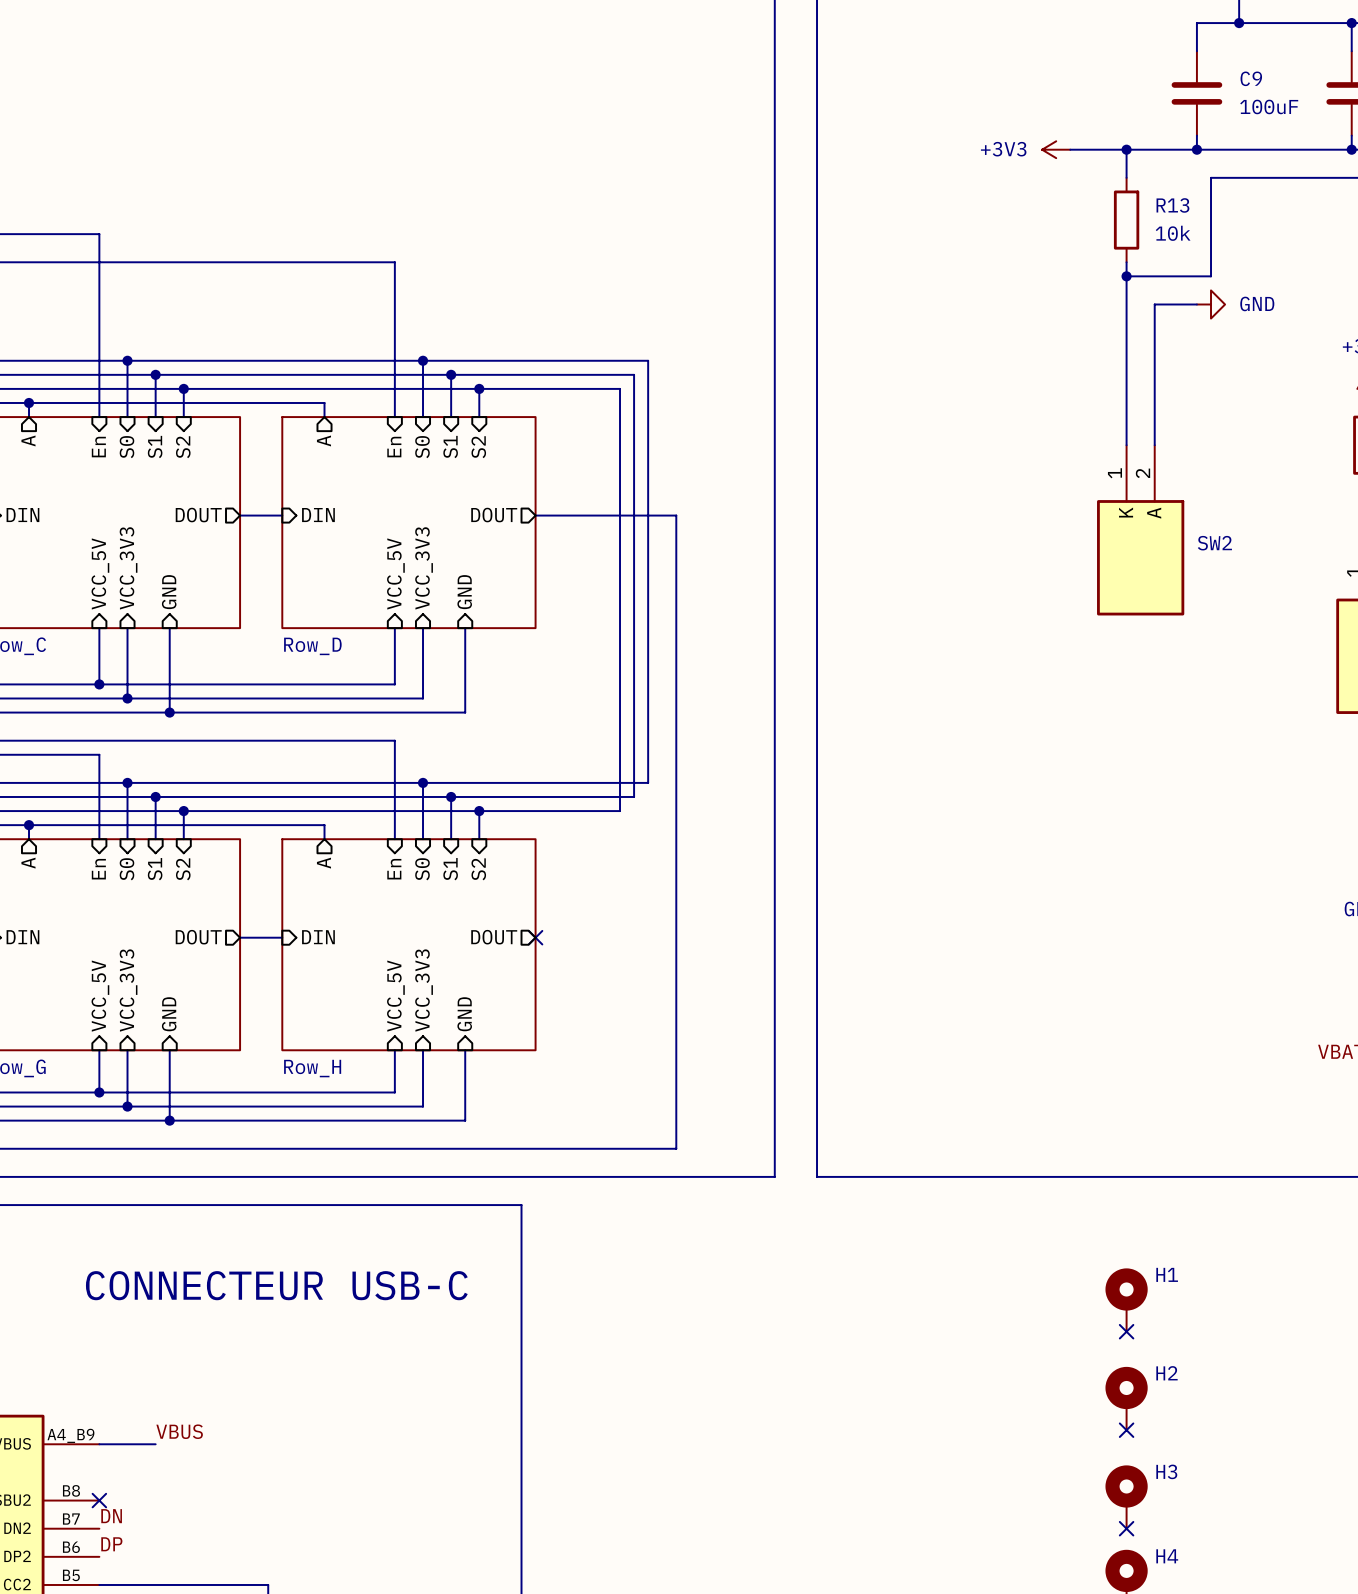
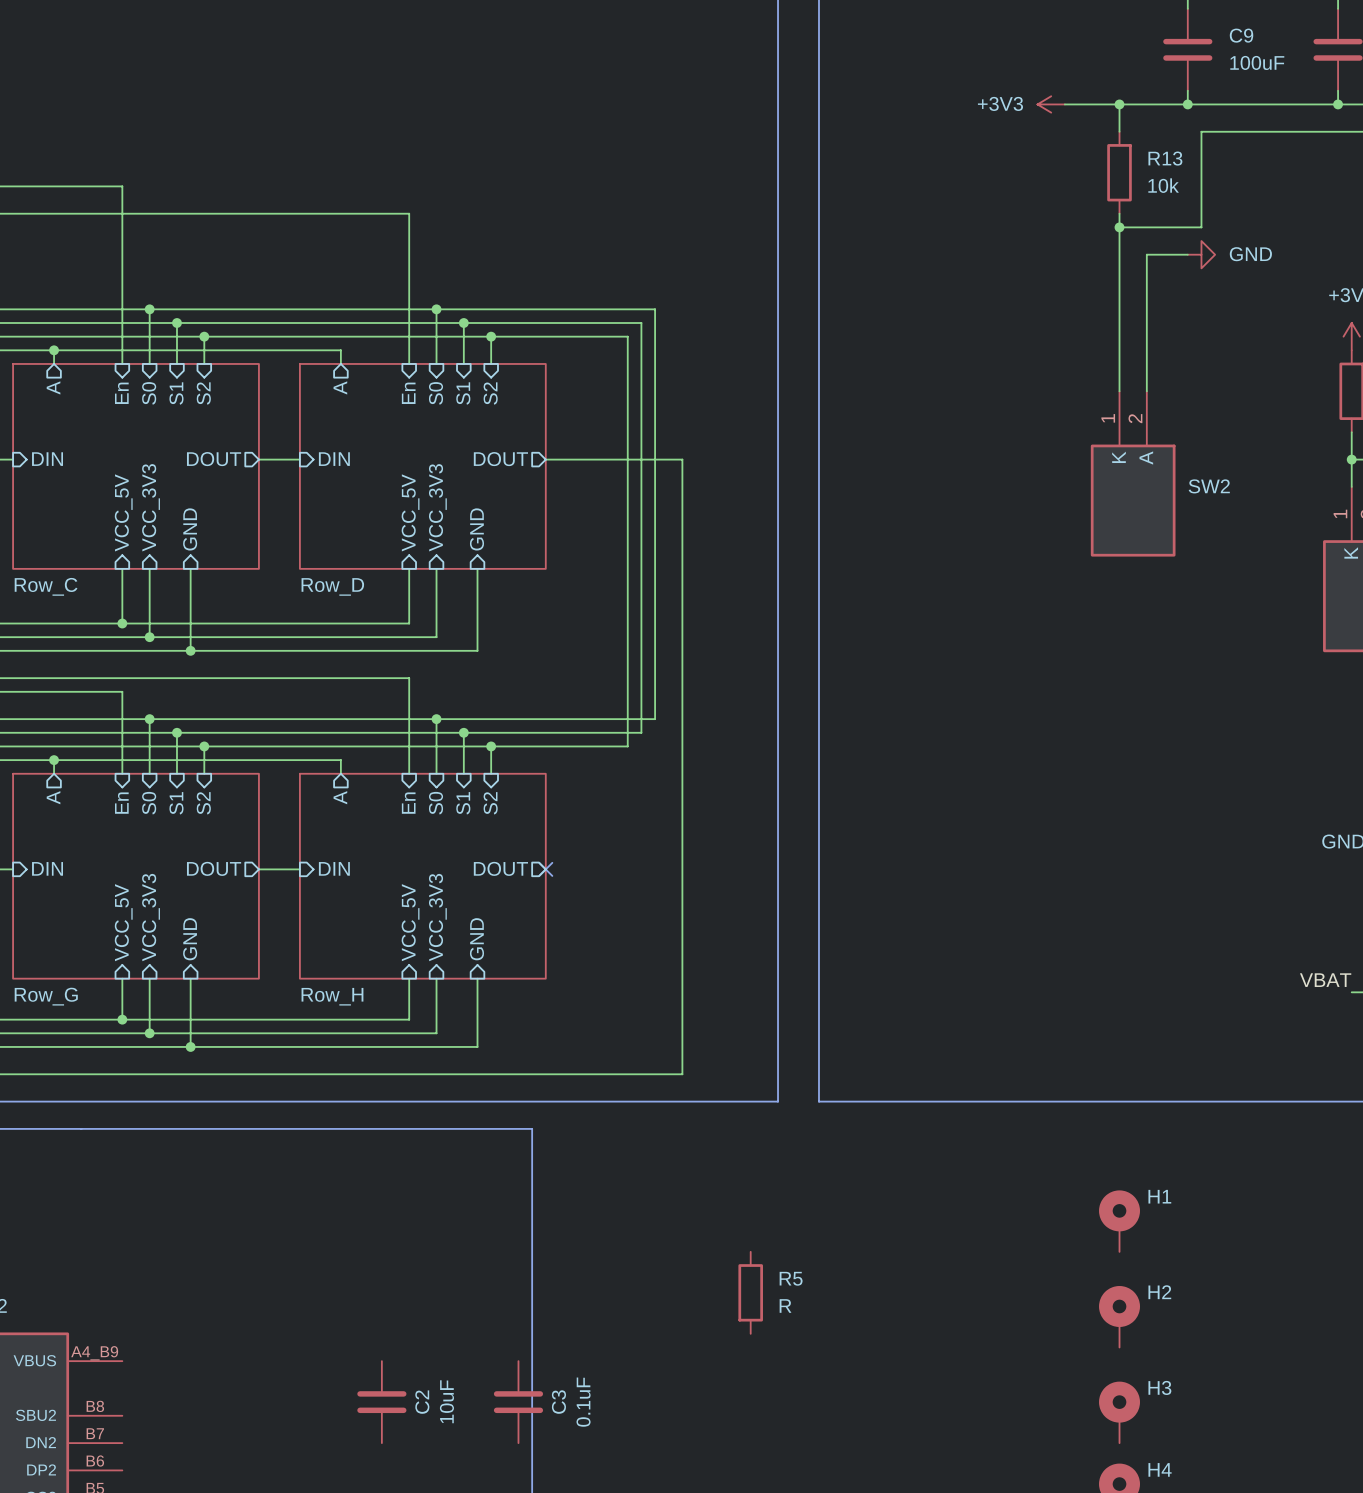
text: CONNECTEUR USB-C (276, 1285) -> none
no-connect mark: (1126, 1331) -> none
R5: none -> R (750, 1292)
no-connect mark: (1126, 1430) -> none
label: VBUS (179, 1431) -> none
wire: (99, 1444) (155, 1444) -> none
C2: none -> 10uF (381, 1402)
C3: none -> 0.1uF (518, 1402)
no-connect mark: (99, 1500) -> none
label: DN (111, 1516) -> none
no-connect mark: (1126, 1528) -> none
label: DP (111, 1544) -> none

